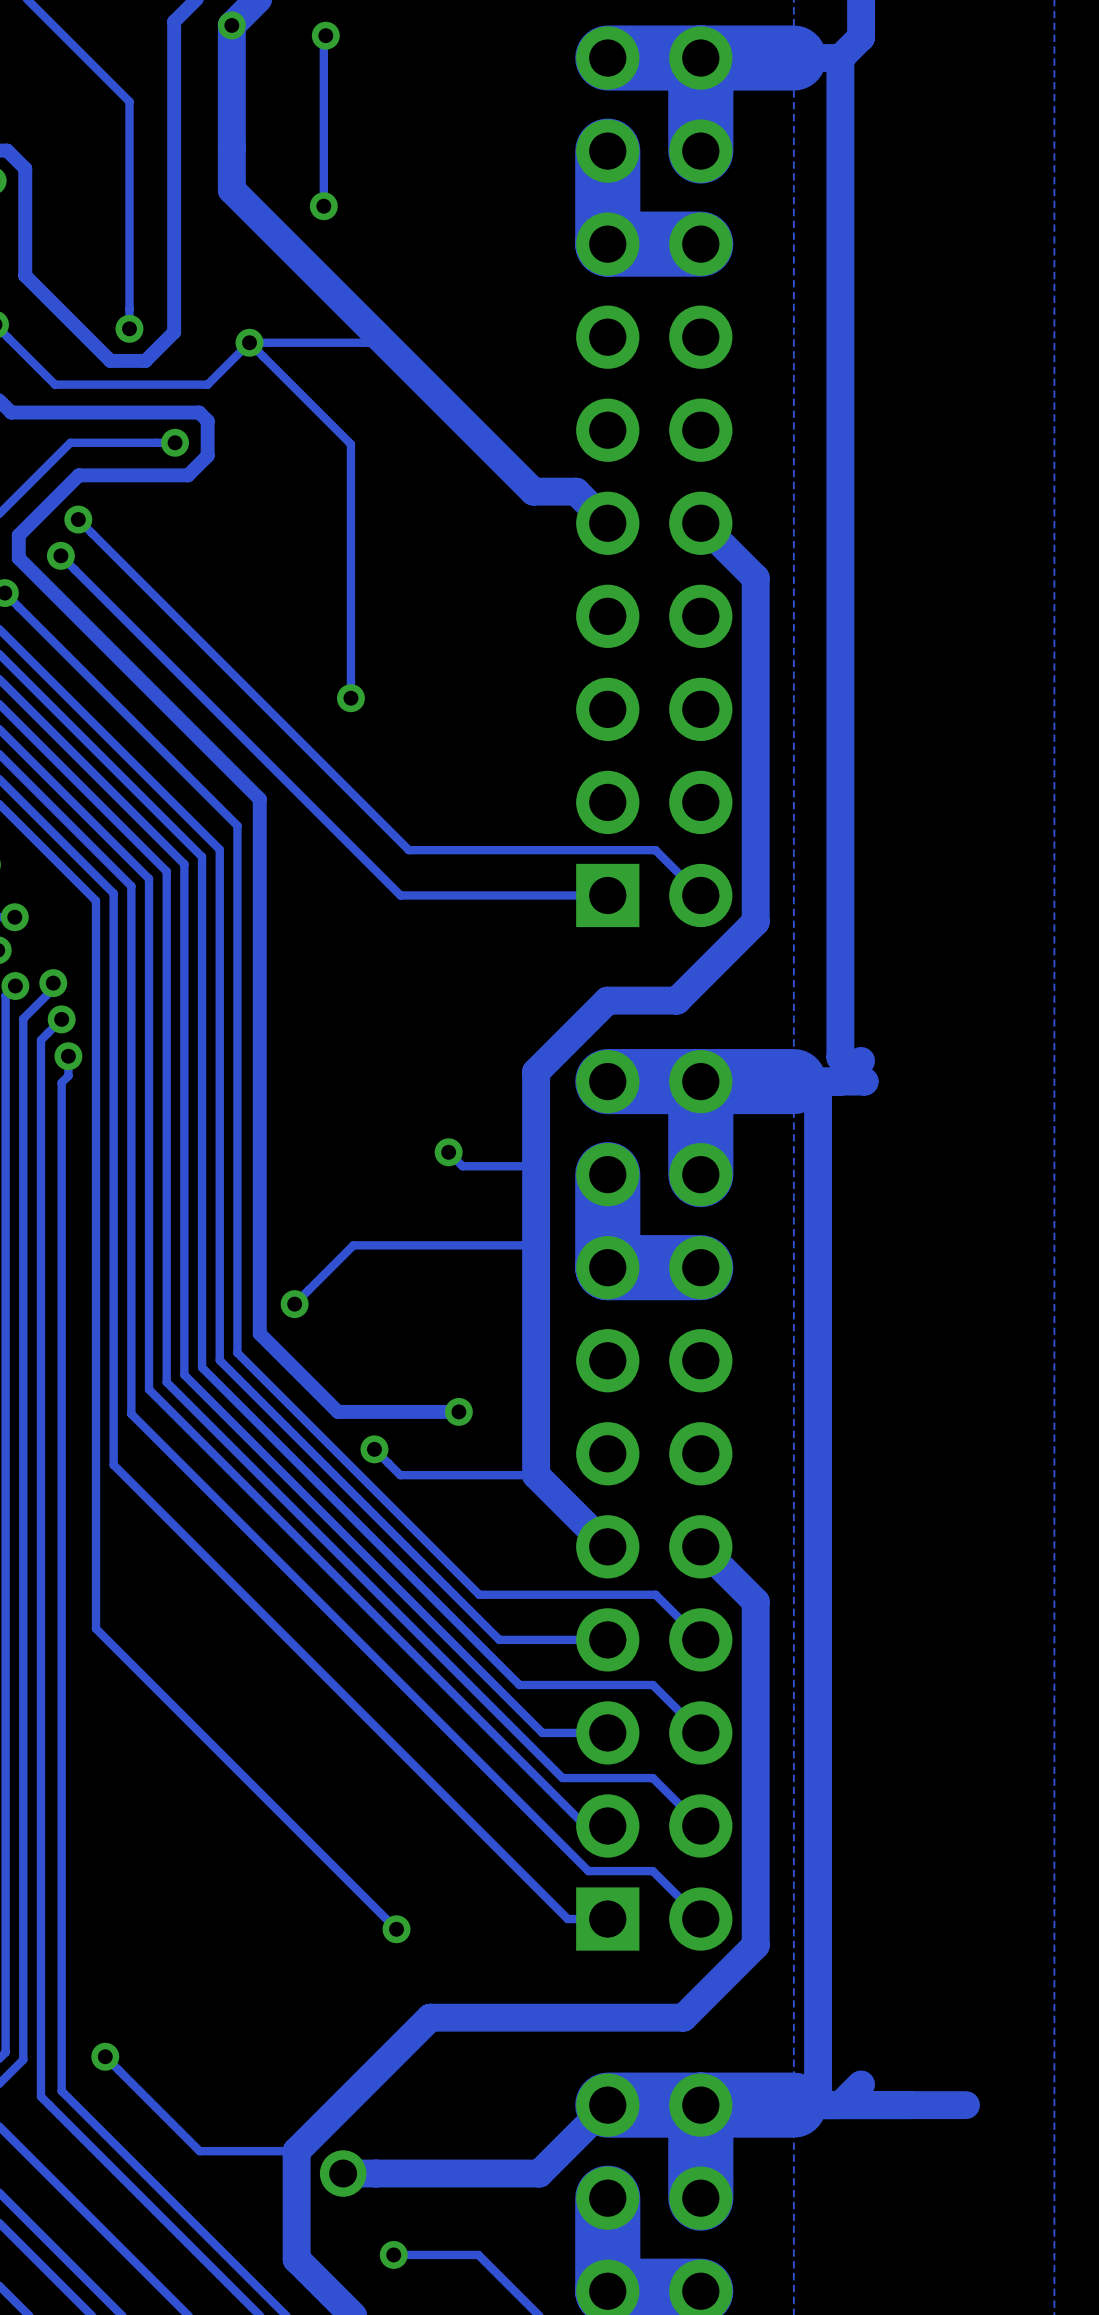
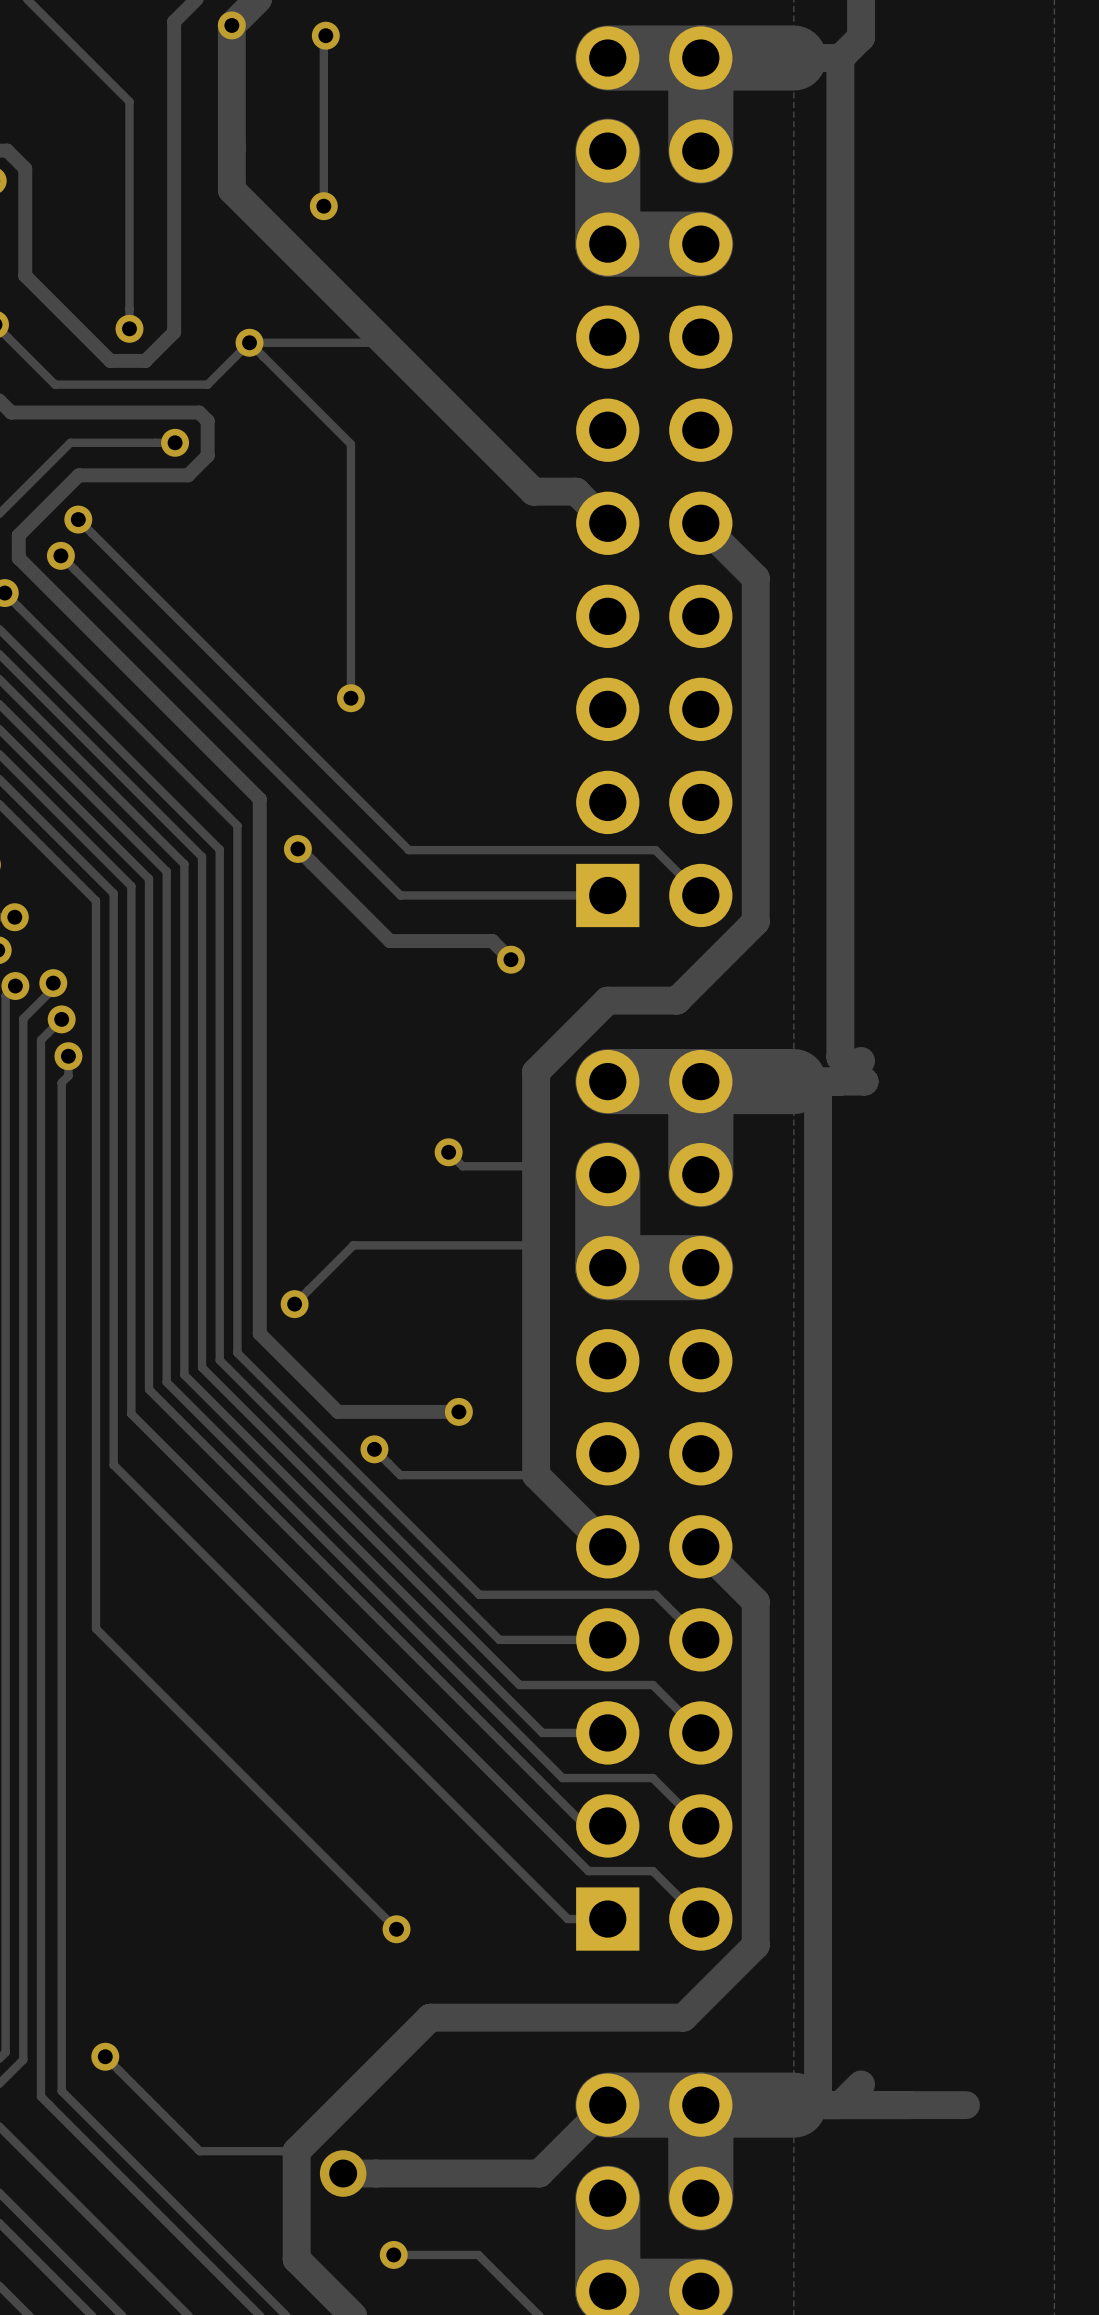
track: none -> (297, 848) (390, 941) (492, 941) (510, 959)
via: none -> (297, 848)
via: none -> (510, 959)

